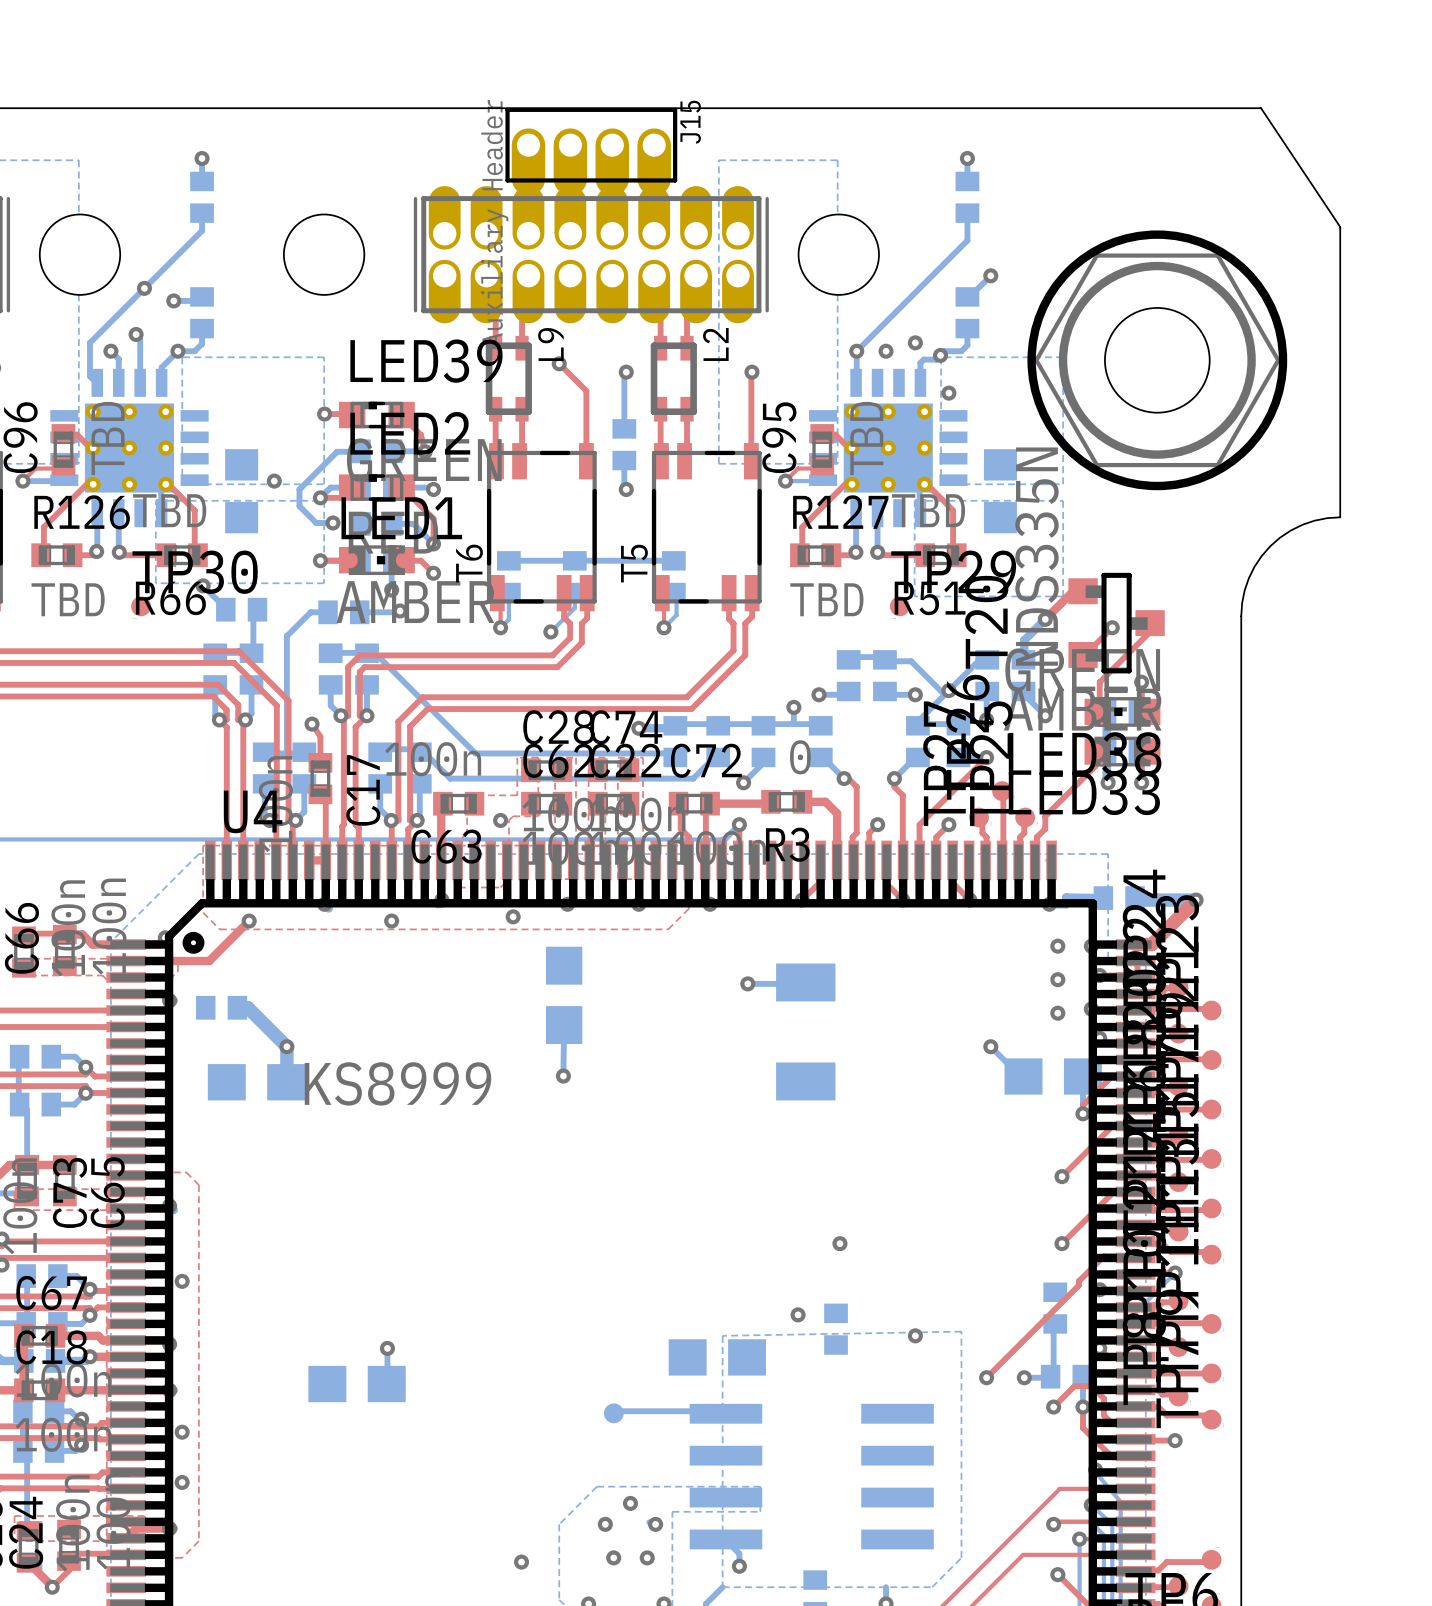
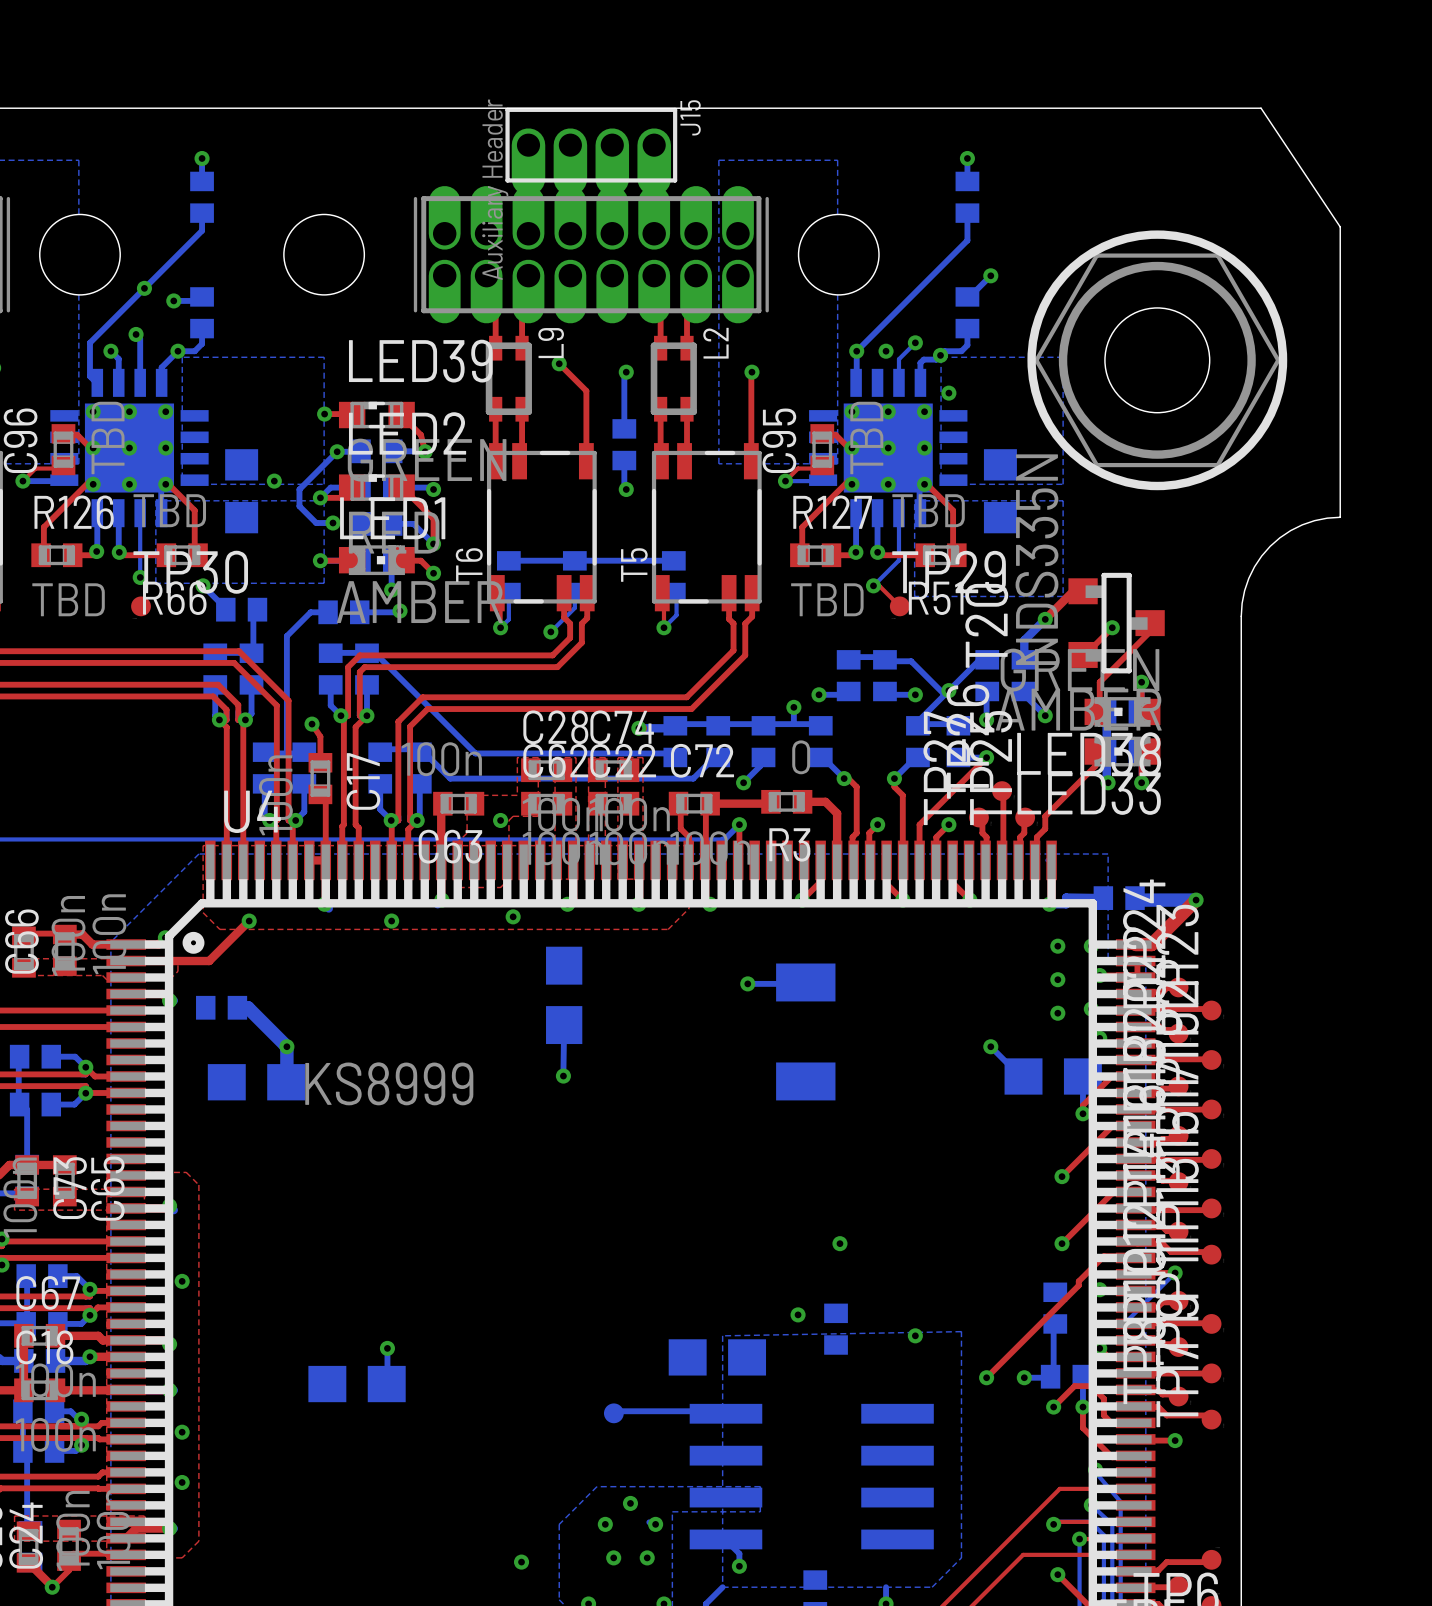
bottom track: none -> (915, 342) (898, 359) (898, 382)
via: none -> (337, 451)
bottom track: none -> (140, 513) (140, 577)
bottom track: none -> (898, 513) (898, 560) (873, 585)
via: none -> (140, 577)
top track: none -> (873, 585) (879, 585) (899, 606)
via: none -> (873, 585)

